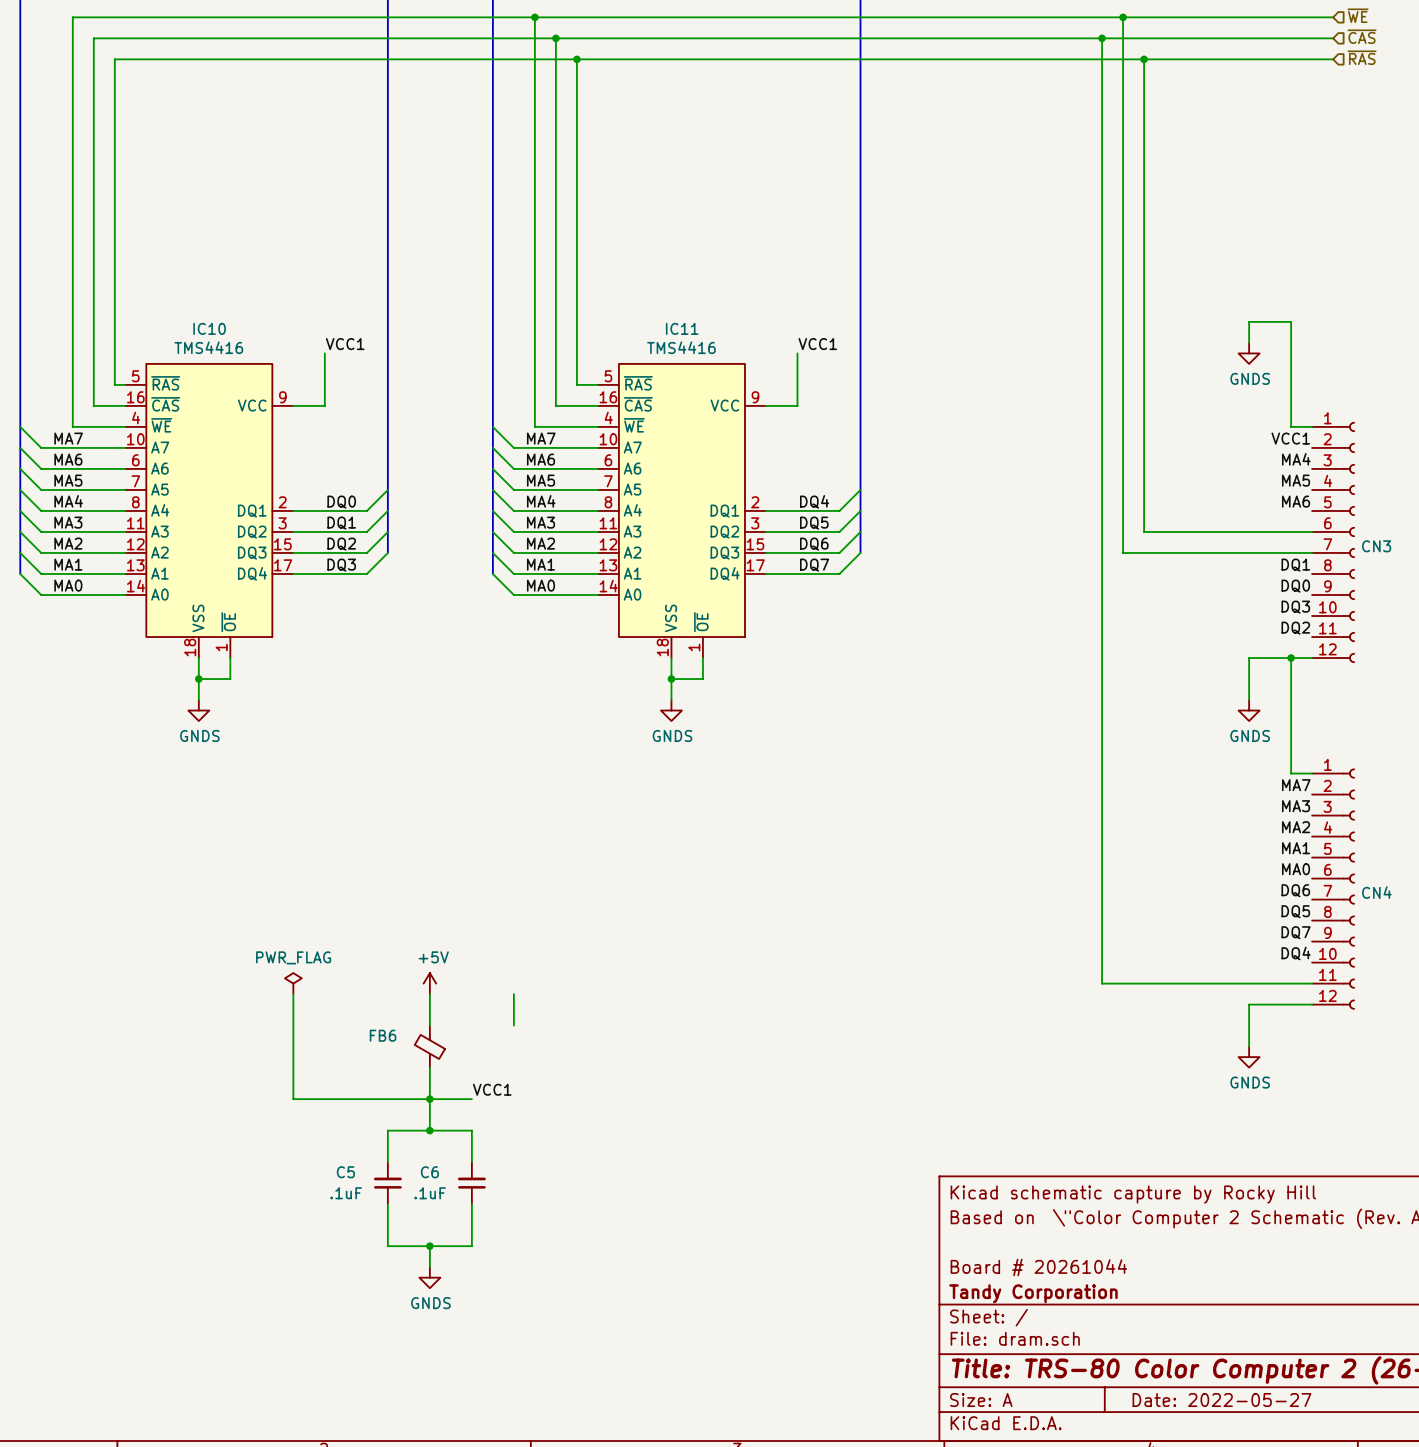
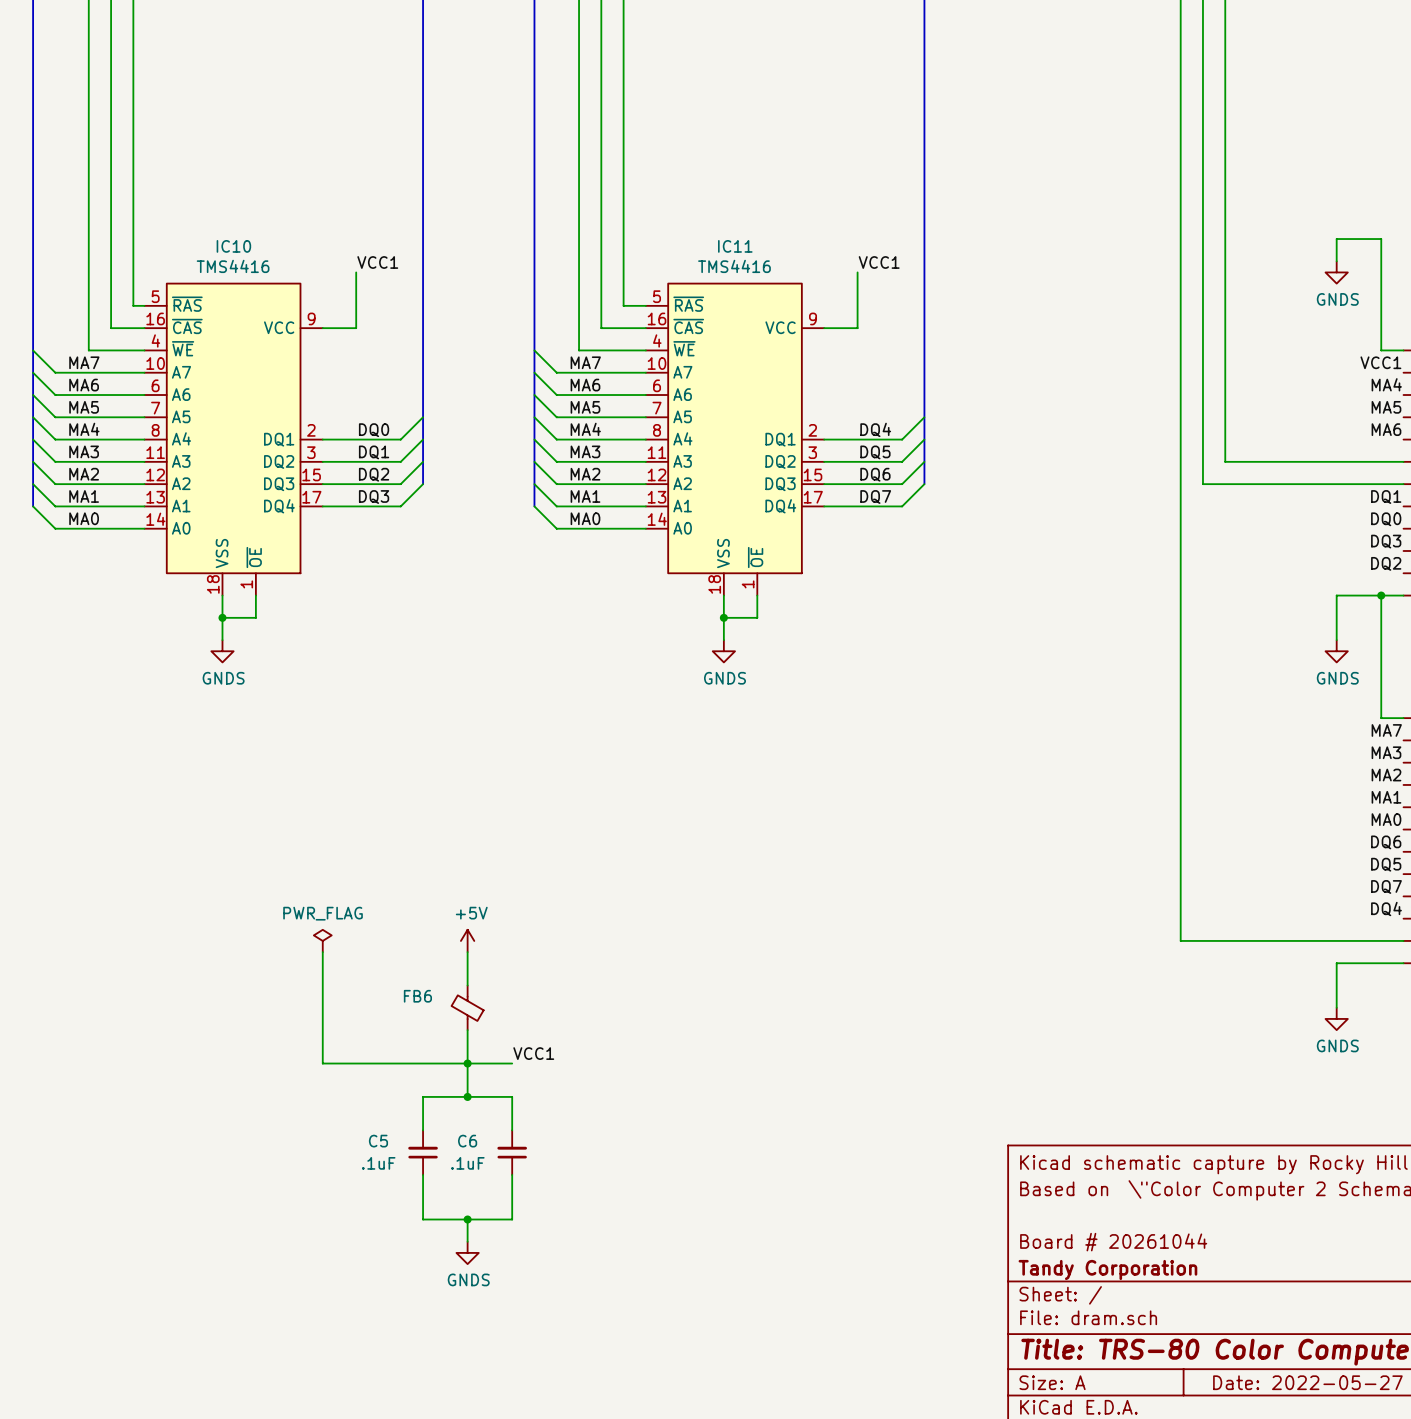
wire: (513, 994) (513, 1025) -> none

